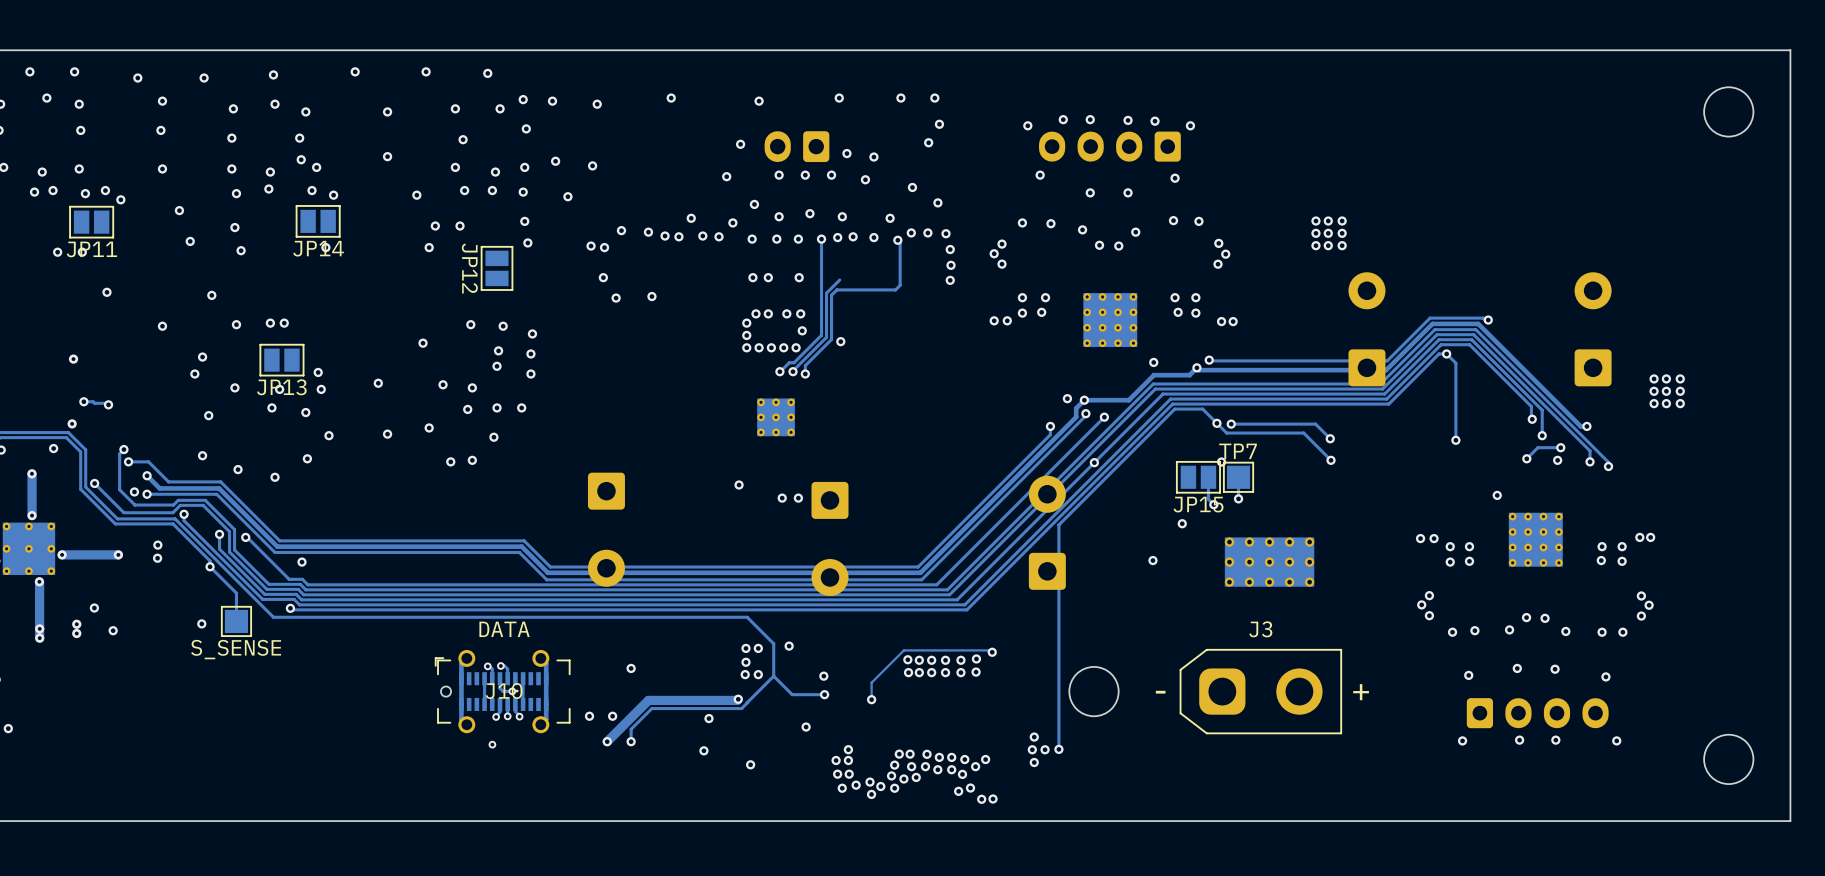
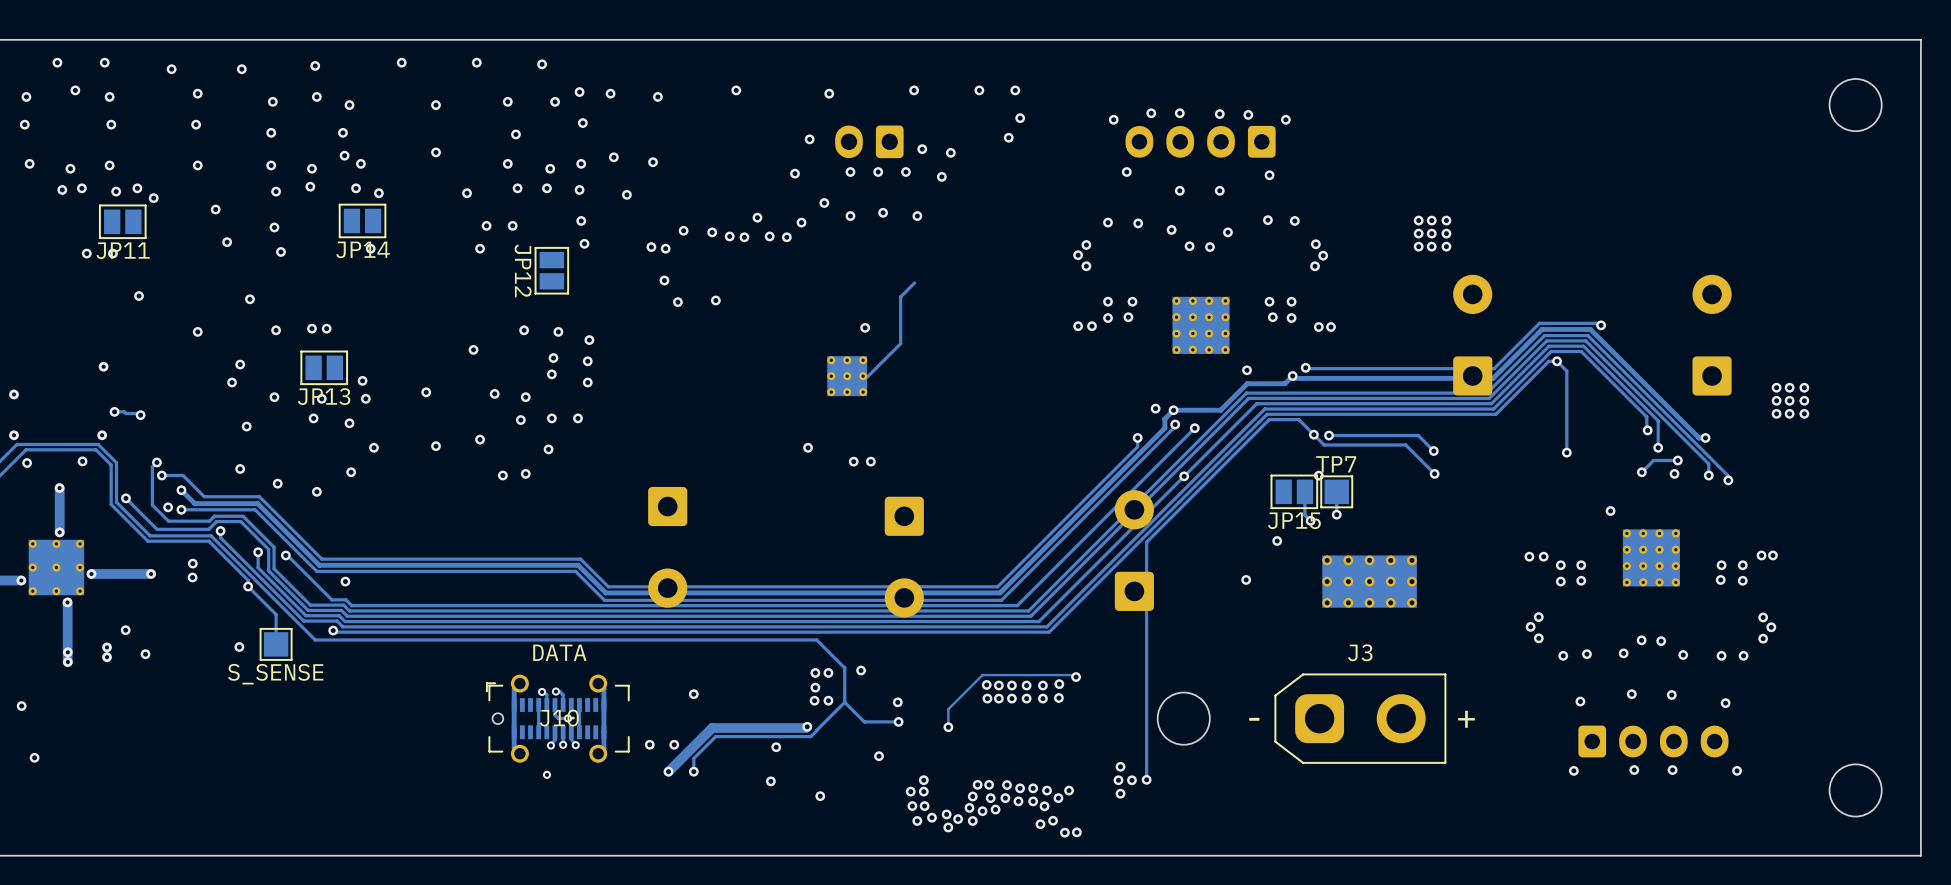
via: (912, 187) -> none
via: (937, 202) -> none
via: (890, 218) -> none
via: (911, 232) -> none
via: (927, 232) -> none
via: (946, 233) -> none
via: (853, 236) -> none
via: (837, 237) -> none
via: (873, 237) -> none
via: (752, 239) -> none
via: (776, 239) -> none
via: (798, 239) -> none
track: (821, 239) (821, 335) (794, 362) (789, 362) (779, 371) -> none
via: (821, 239) -> none
track: (897, 240) (900, 242) (900, 285) (895, 289) (836, 289) (831, 295) (831, 339) (805, 365) (805, 374) -> none
via: (897, 240) -> none
via: (950, 249) -> none
via: (951, 265) -> none
via: (752, 277) -> none
via: (768, 277) -> none
via: (799, 277) -> none
via: (950, 280) -> none
via: (756, 313) -> none
via: (768, 313) -> none
via: (786, 313) -> none
via: (800, 313) -> none
via: none -> (865, 327)
via: (746, 323) -> none
via: (802, 330) -> none
via: (746, 335) -> none
via: (840, 341) -> none
via: (746, 347) -> none
via: (759, 347) -> none
via: (771, 347) -> none
via: (783, 347) -> none
via: (796, 347) -> none
via: (779, 371) -> none
via: (793, 371) -> none
via: (805, 374) -> none
part position: (776, 417) -> (847, 376)
via: none -> (808, 447)
via: none -> (853, 461)
via: none -> (870, 461)
via: (739, 485) -> none
via: (782, 498) -> none
via: (798, 498) -> none

